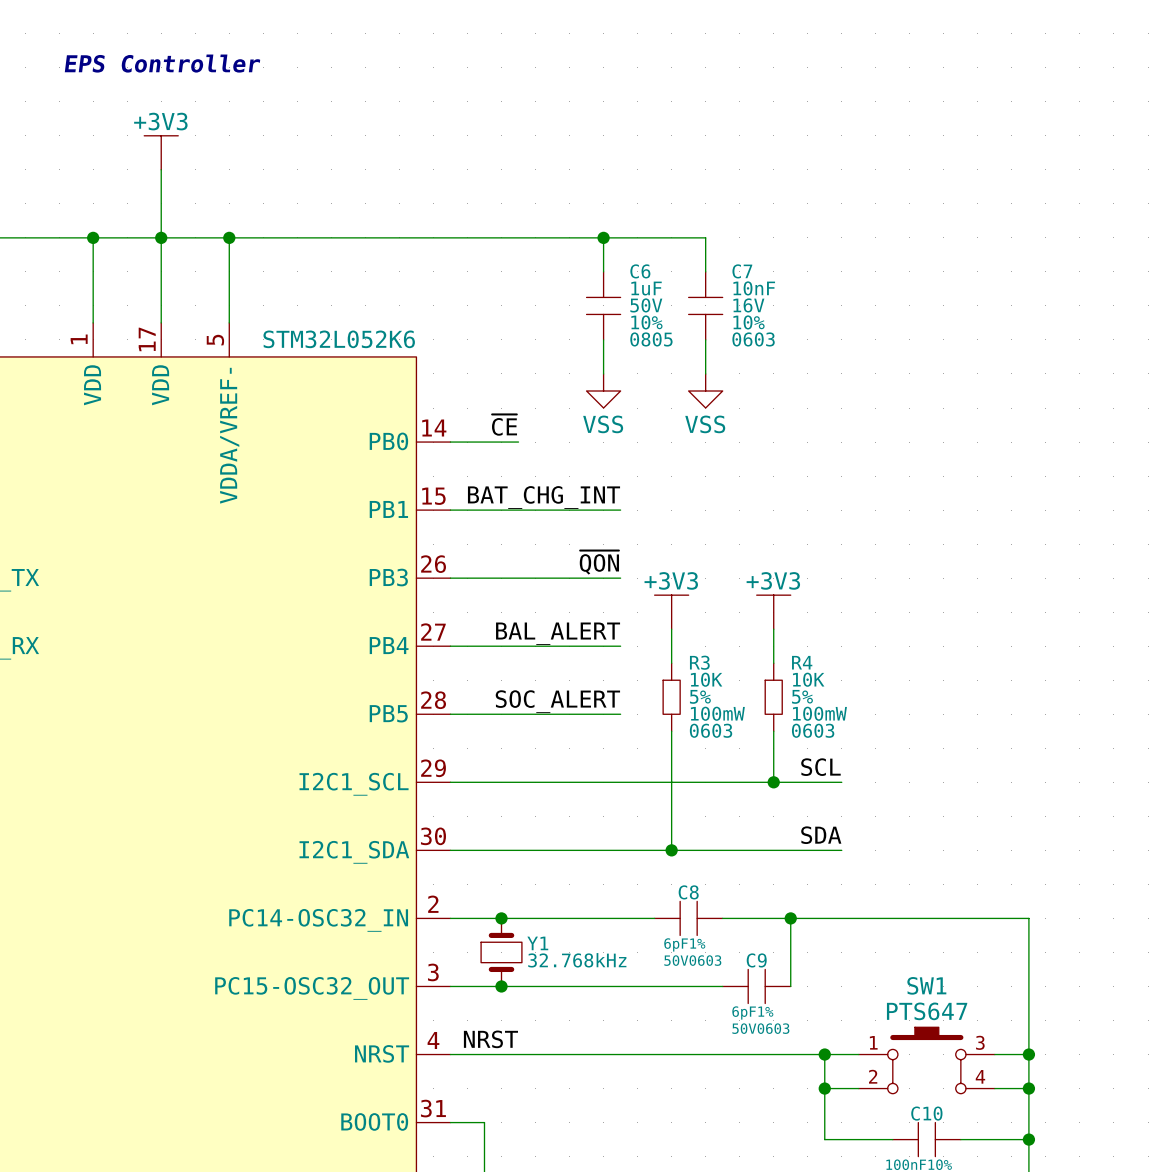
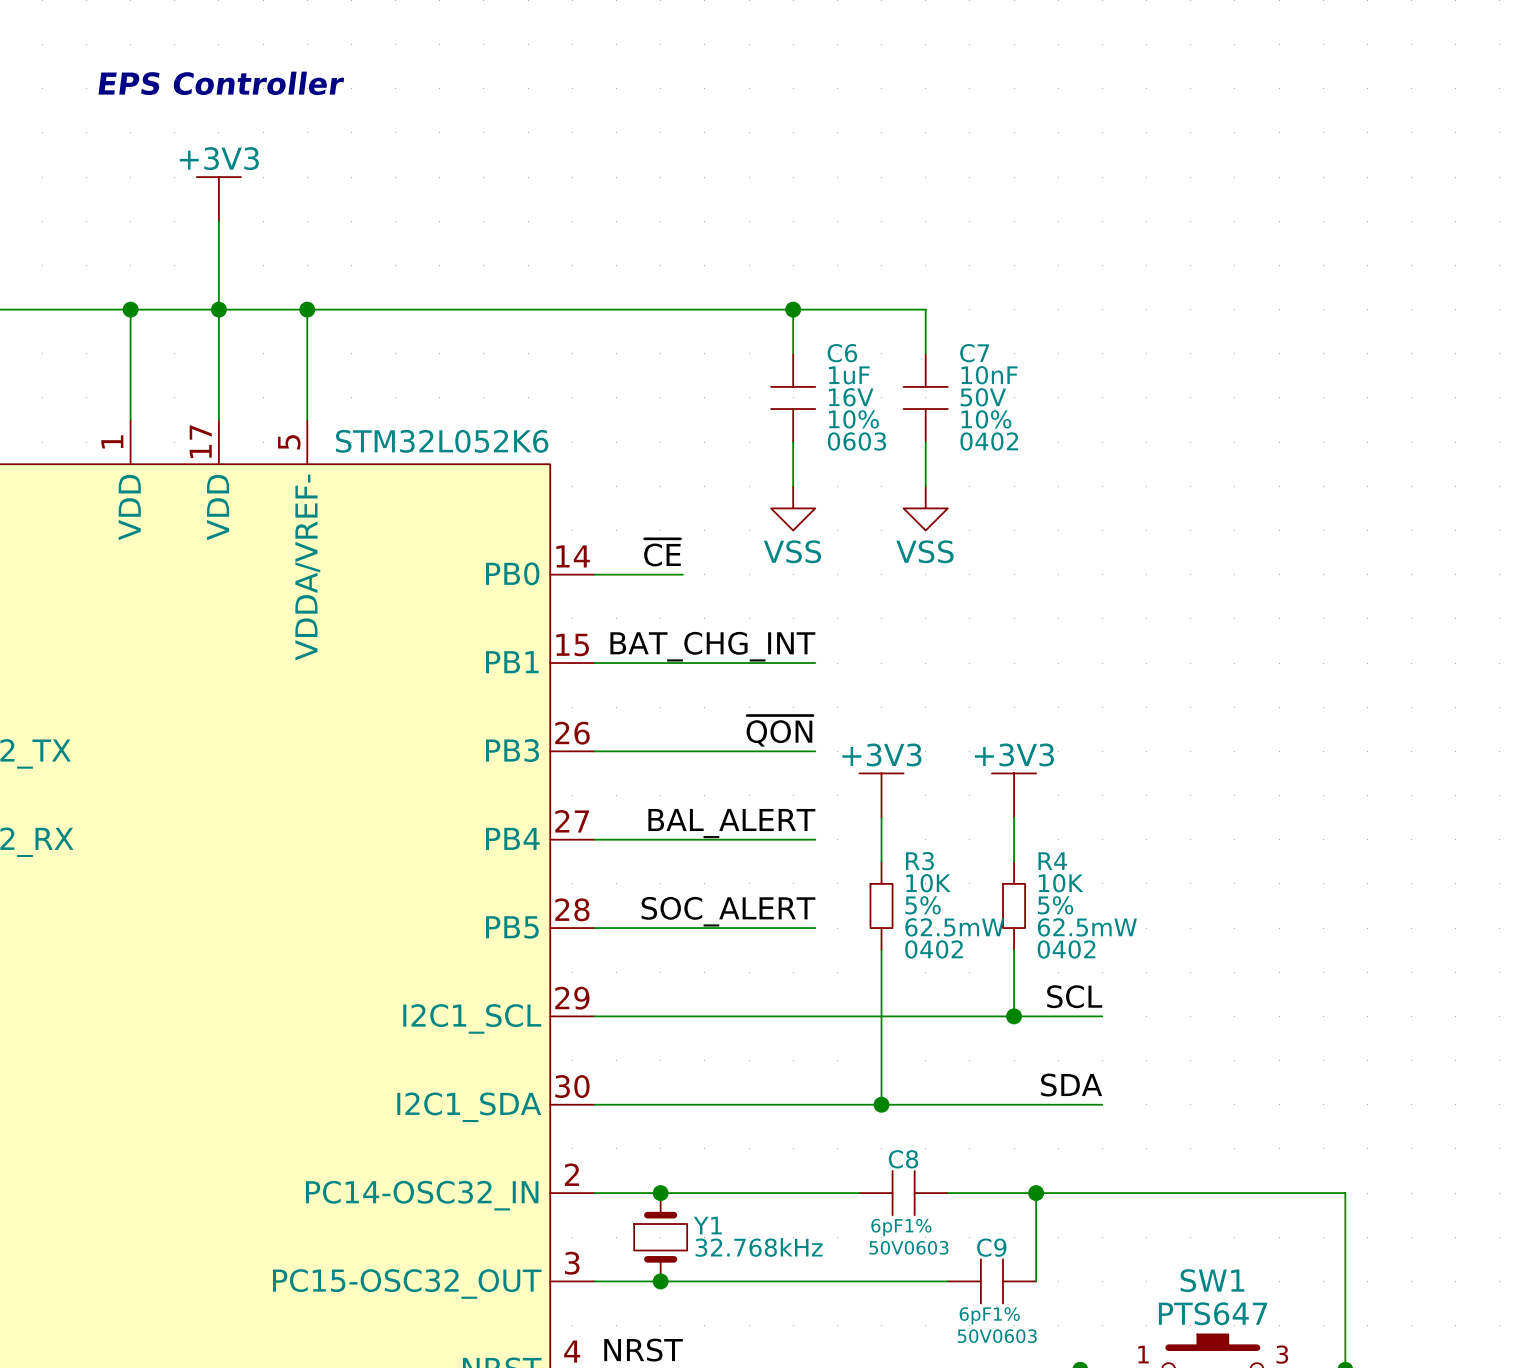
C6 text: 50V (646, 305) -> 16V (851, 397)
C7 text: 16V (748, 305) -> 50V (983, 397)
C6 text: 0805 (651, 339) -> 0603 (856, 441)
C7 text: 0603 (753, 339) -> 0402 (989, 441)
R3 text: 100mW (717, 713) -> 62.5mW (954, 927)
R4 text: 100mW (819, 713) -> 62.5mW (1087, 927)
R3 text: 0603 (711, 730) -> 0402 (934, 949)
R4 text: 0603 (813, 730) -> 0402 (1066, 949)

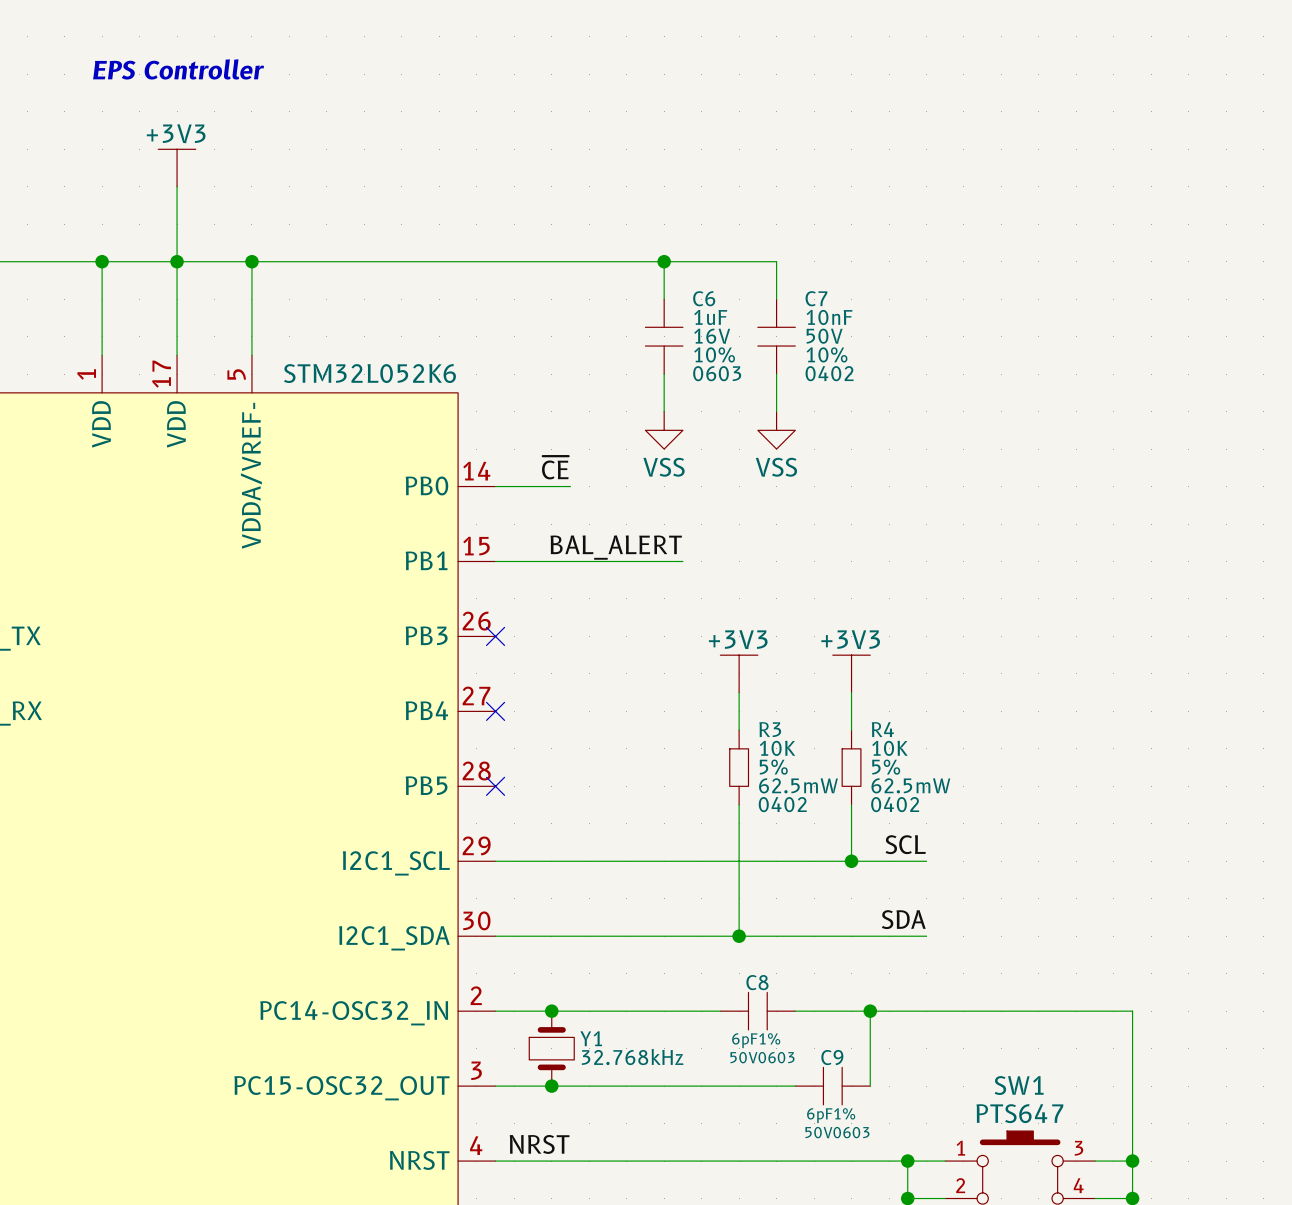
label: BAT_CHG_INT (712, 646) -> BAL_ALERT (616, 547)
label: ~{QON} (779, 731) -> none
wire: (594, 751) (815, 751) -> none
no-connect mark: none -> (495, 636)
label: BAL_ALERT (731, 823) -> none
wire: (594, 839) (815, 839) -> none
no-connect mark: none -> (495, 711)
label: SOC_ALERT (728, 911) -> none
wire: (594, 928) (815, 928) -> none
no-connect mark: none -> (495, 786)

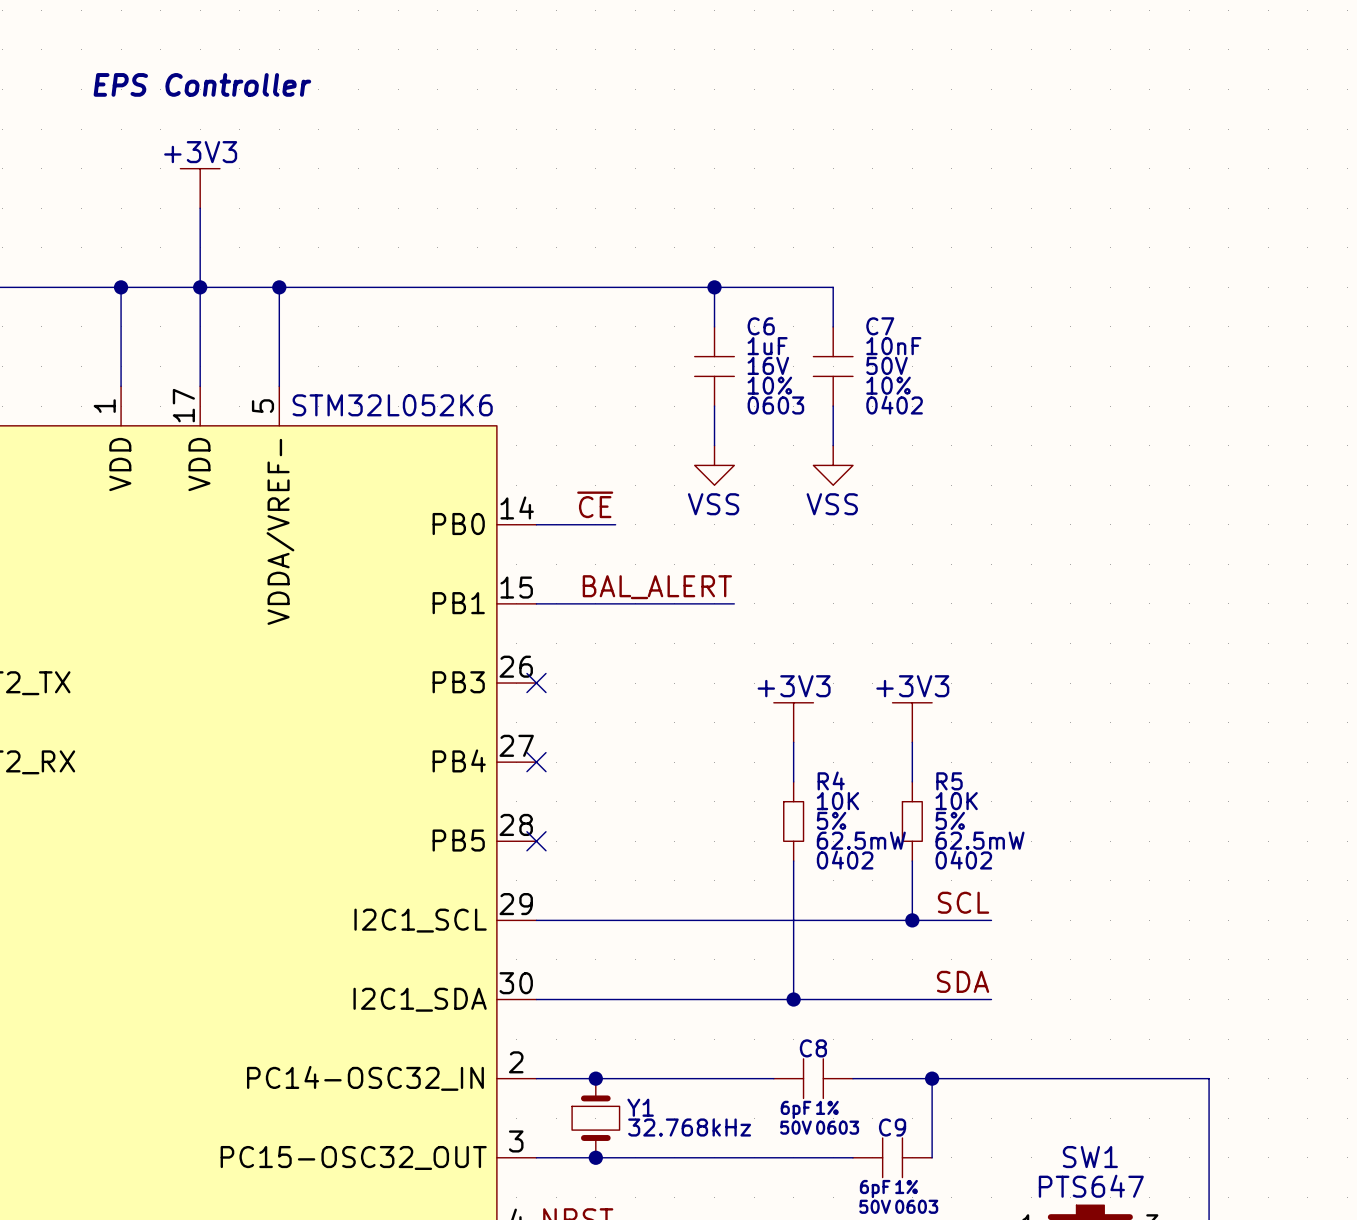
R3 name: R3 (770, 729) -> R4 (831, 780)
R4 name: R4 (882, 729) -> R5 (949, 781)

